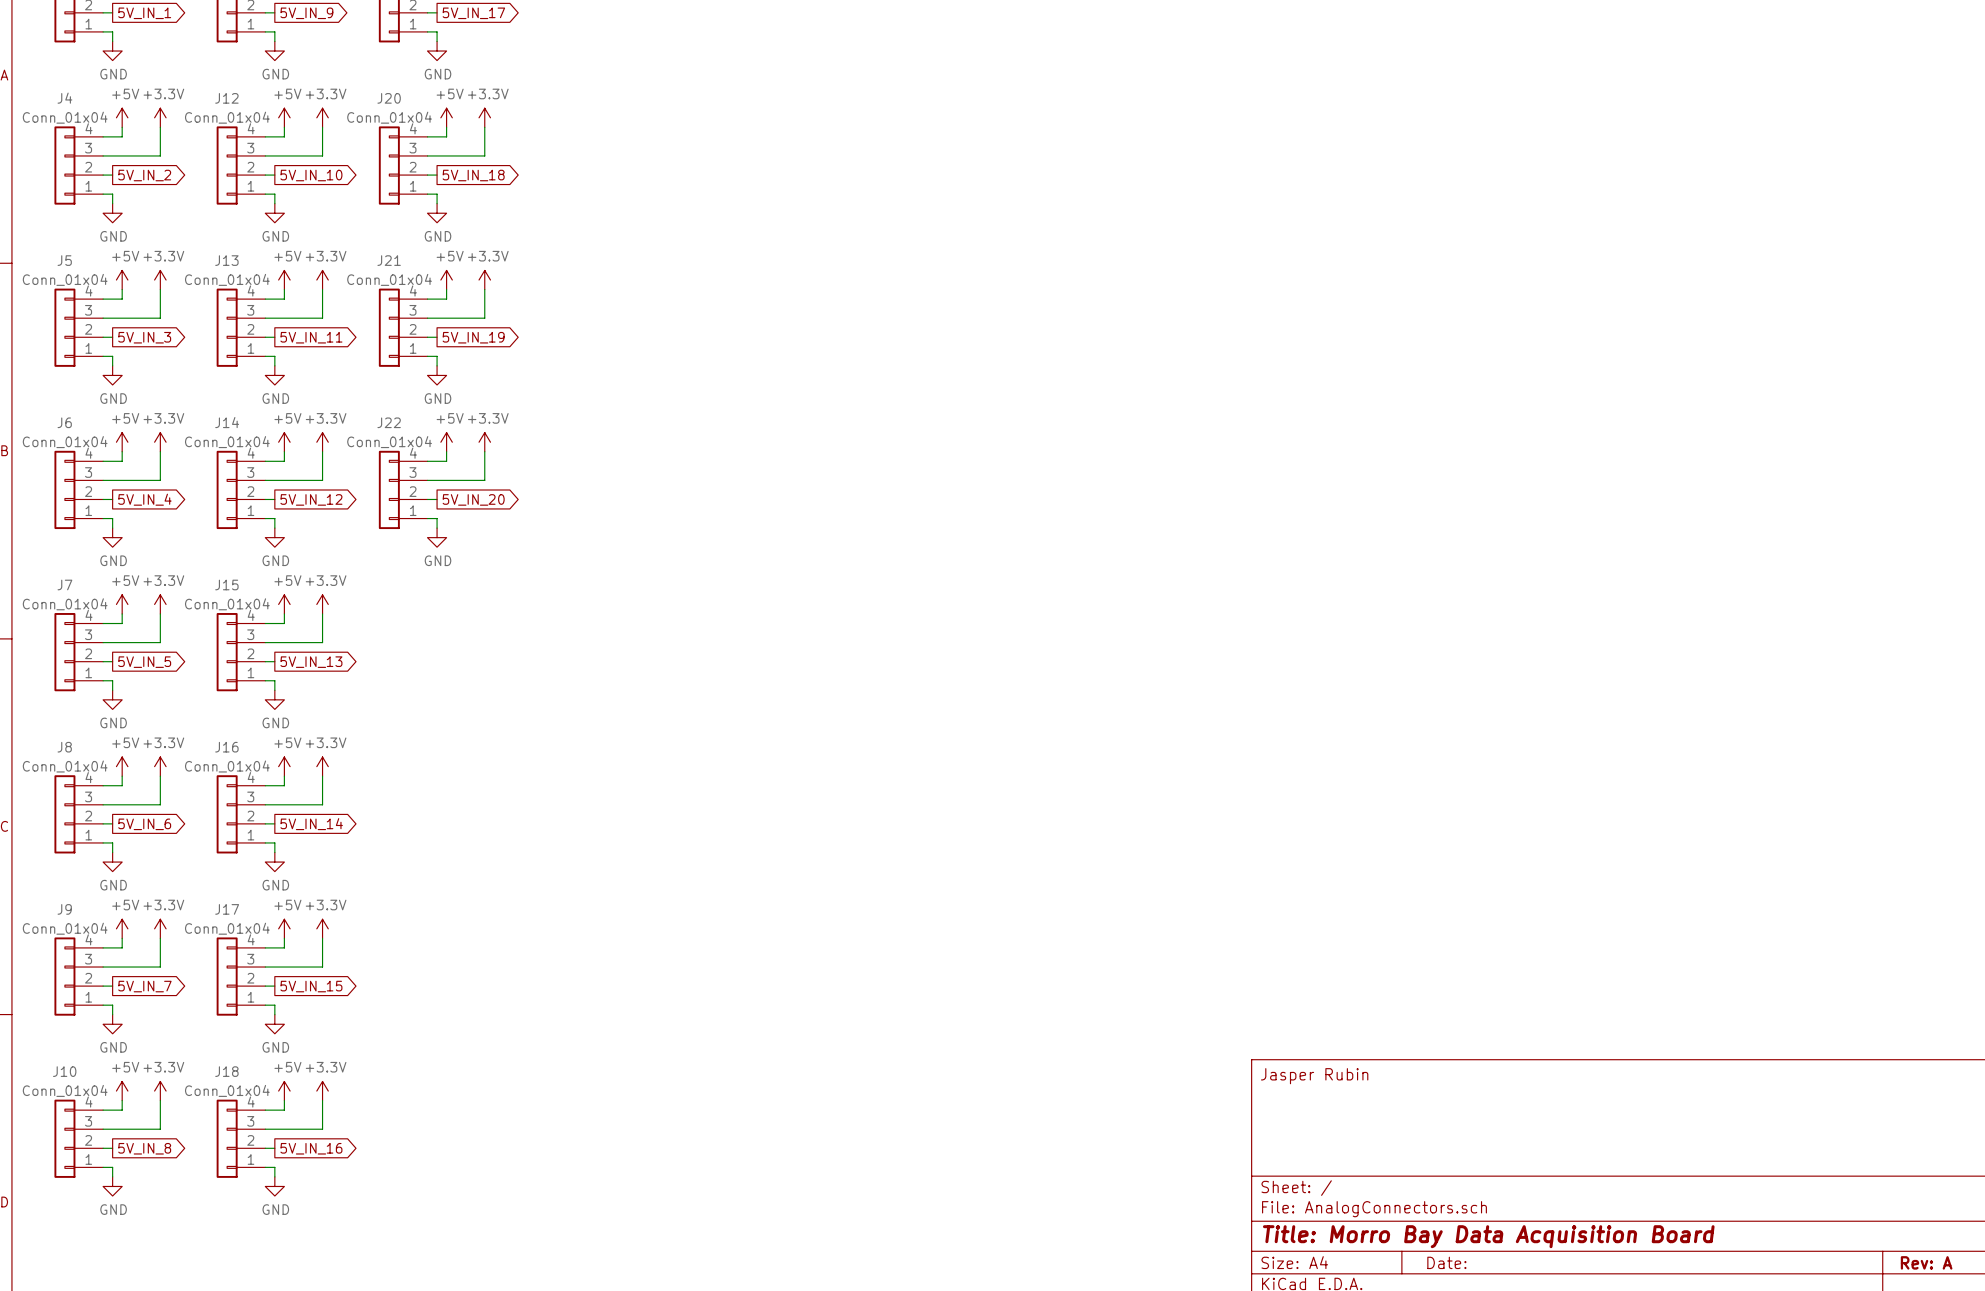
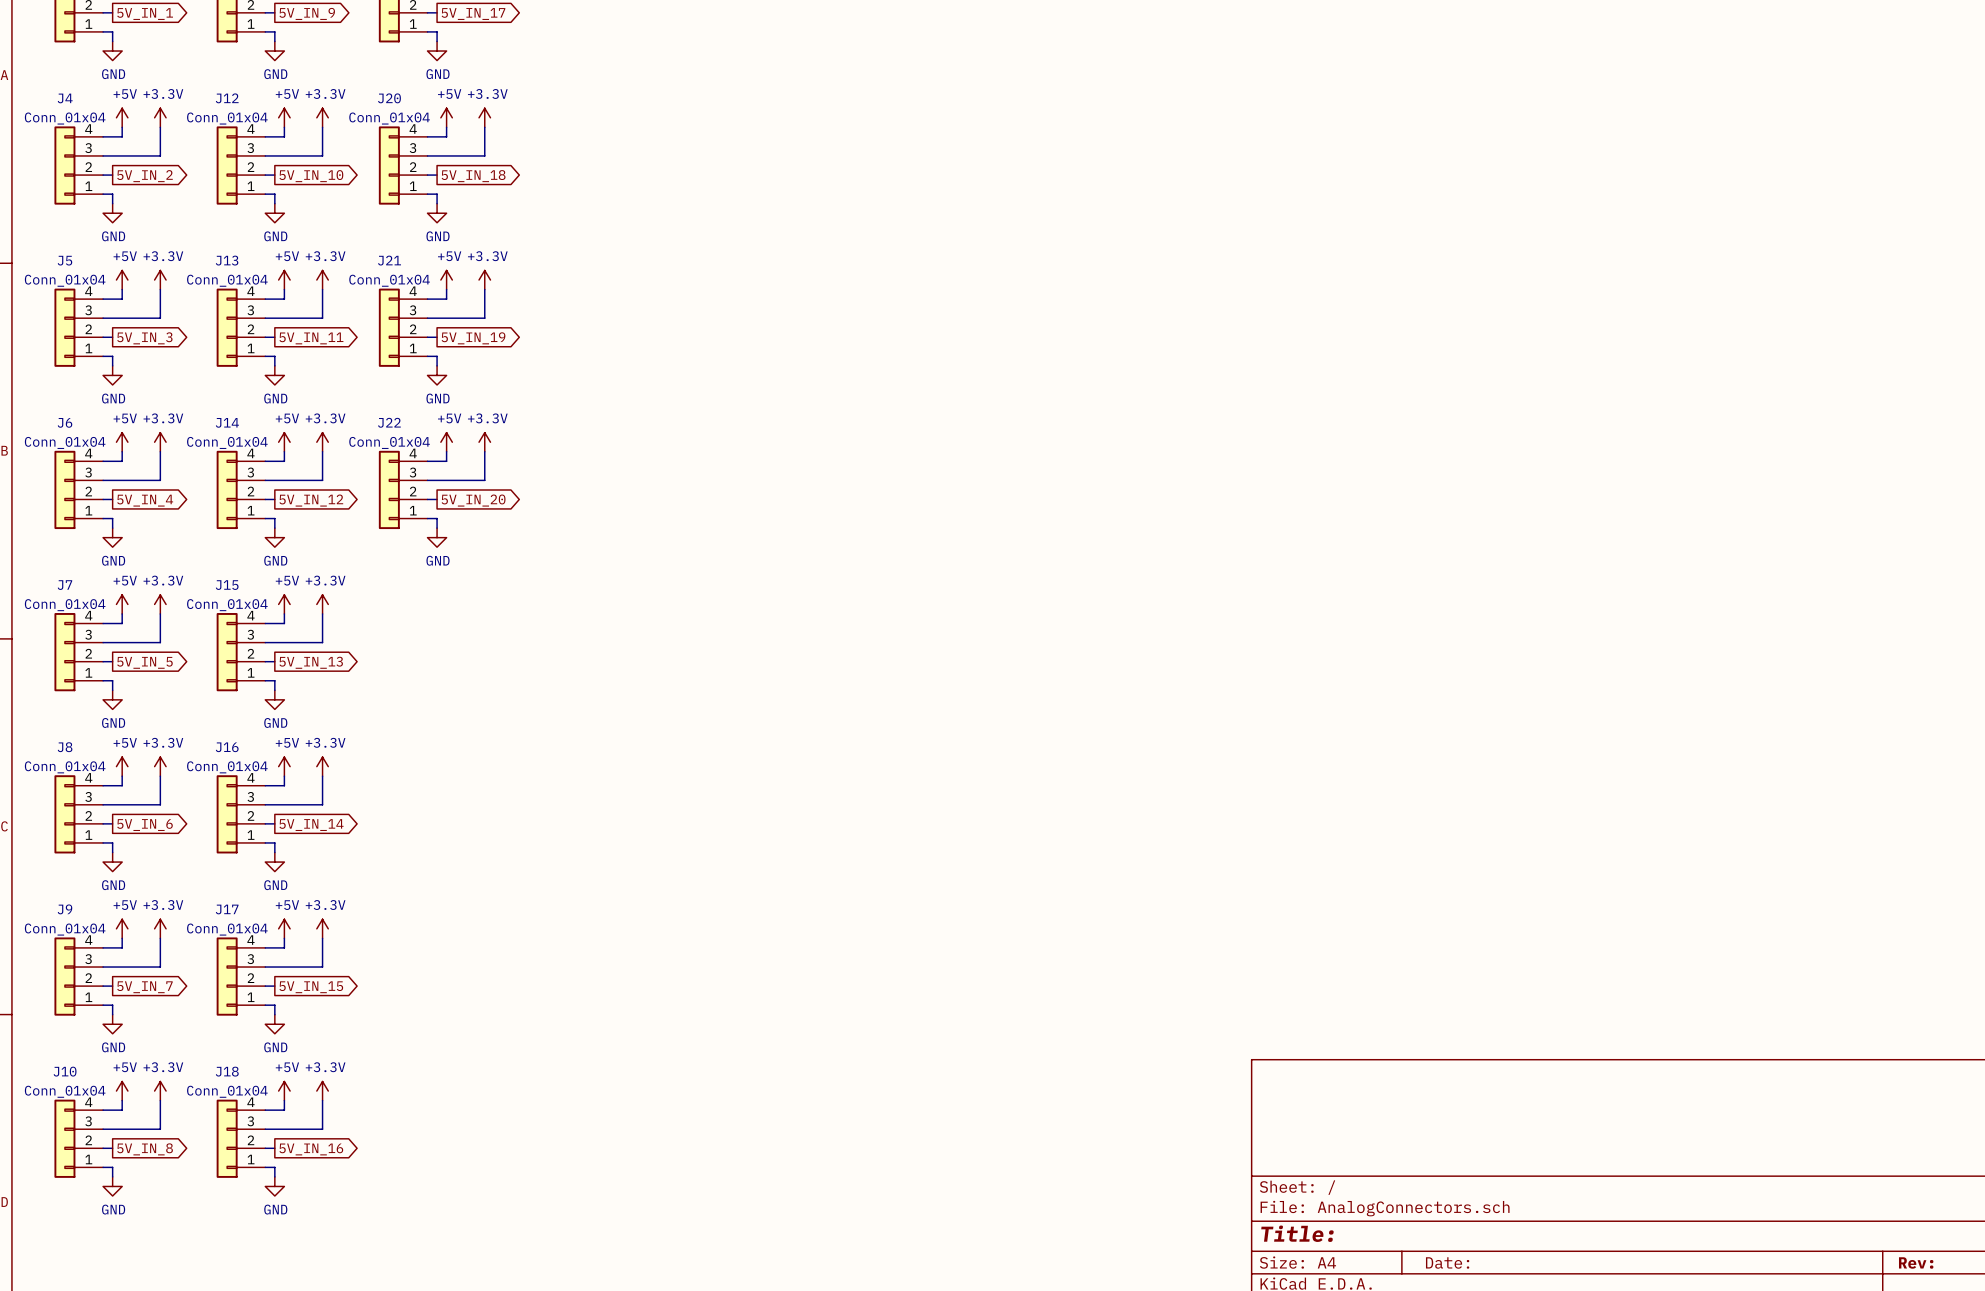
title block: Jasper Rubin (1314, 1076) -> none
title block: Title: Morro Bay Data Acquisition Board (1488, 1236) -> Title: (1297, 1233)
title block: Rev: A (1926, 1262) -> Rev: (1916, 1262)

